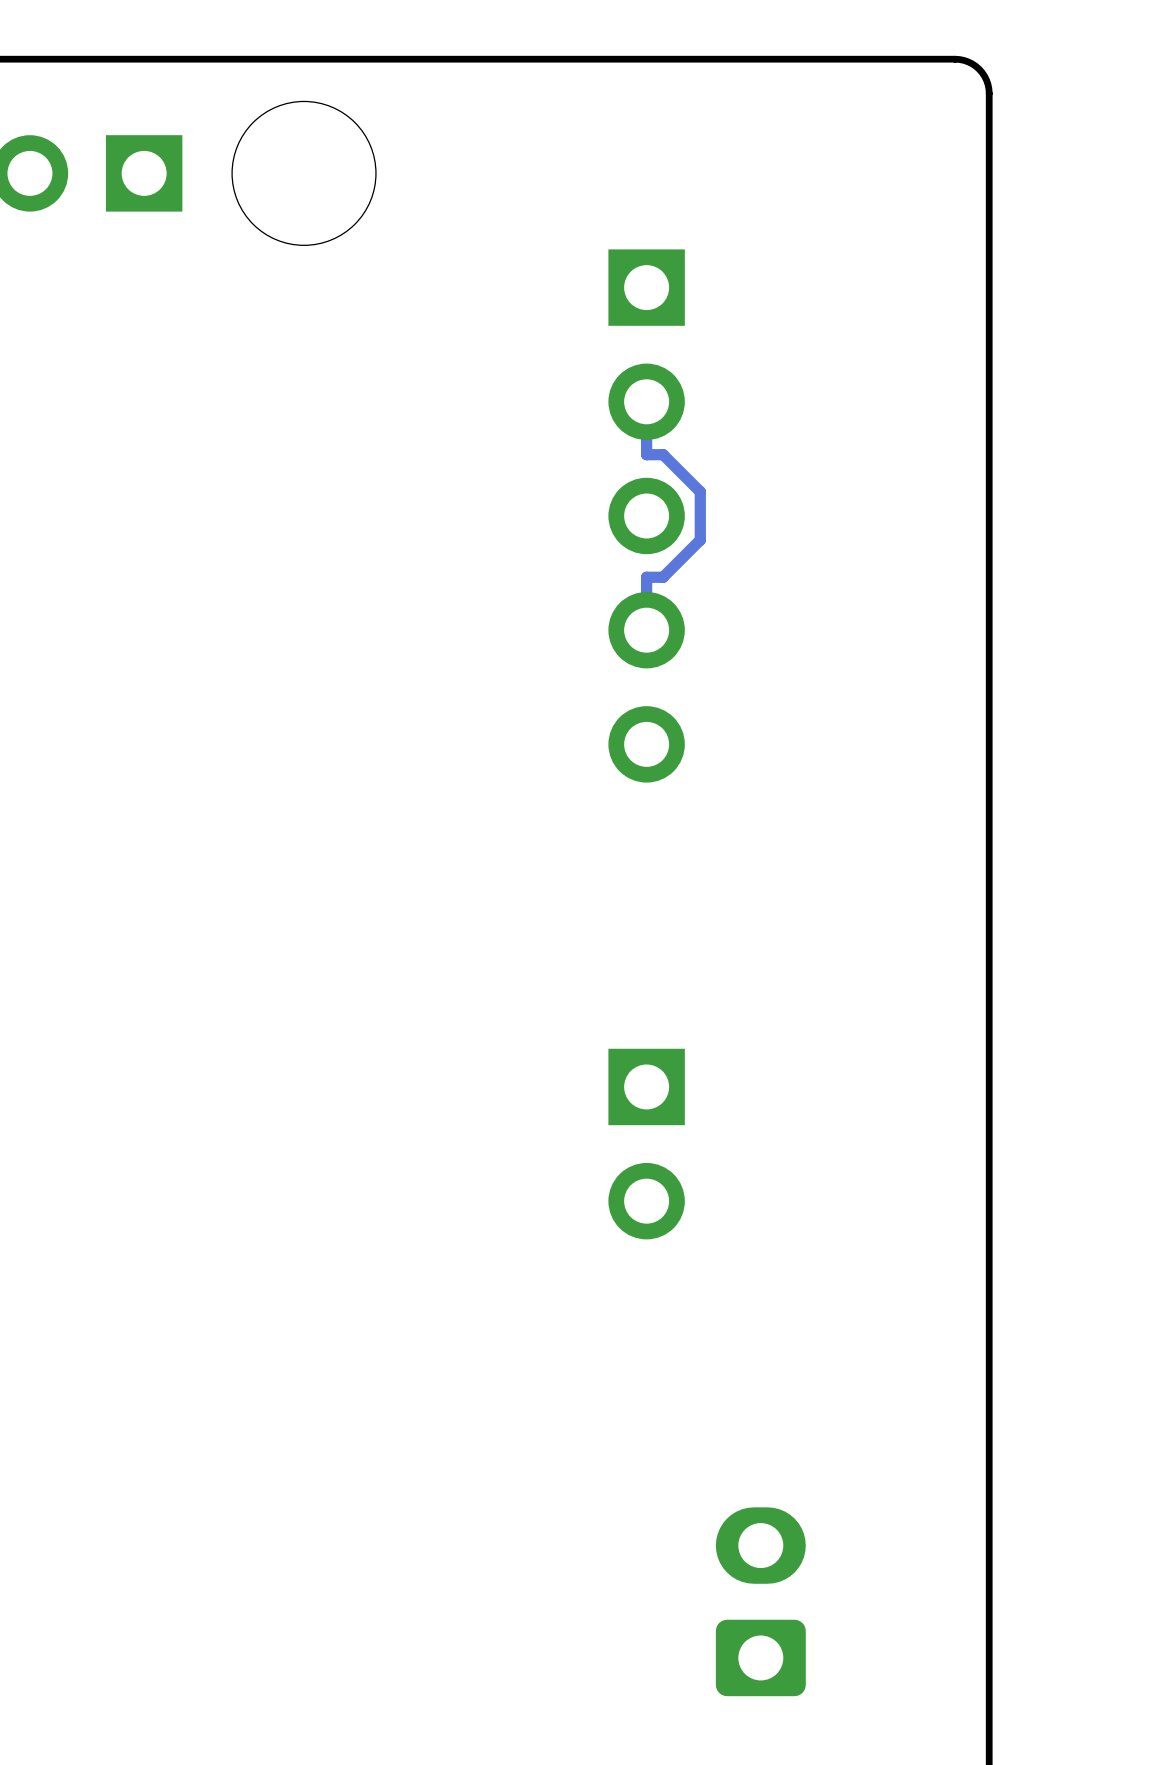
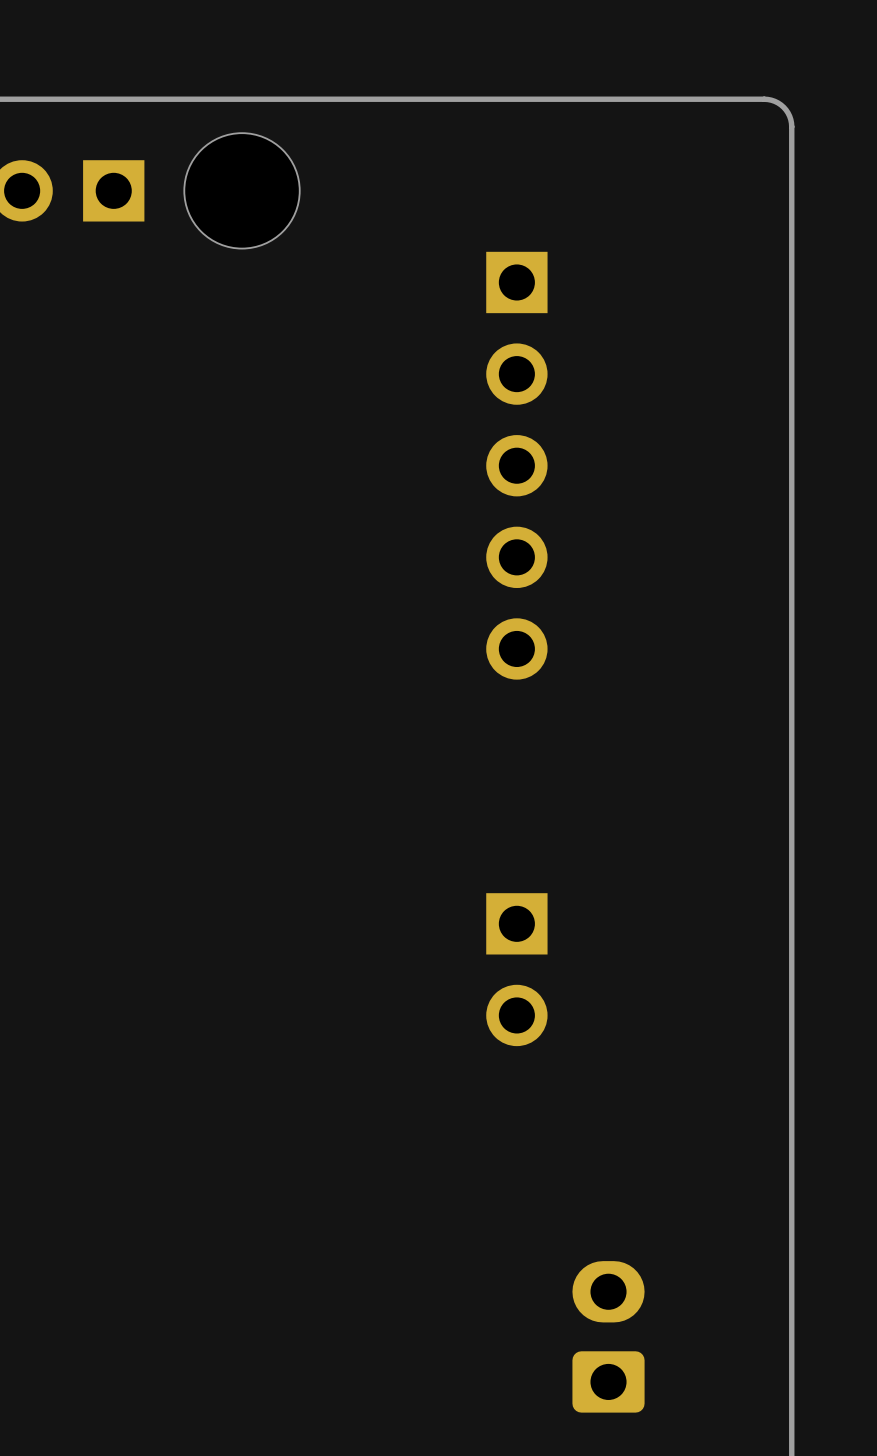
track: (646, 401) (646, 454) (663, 454) (700, 491) (700, 540) (663, 577) (646, 577) (646, 630) -> none

